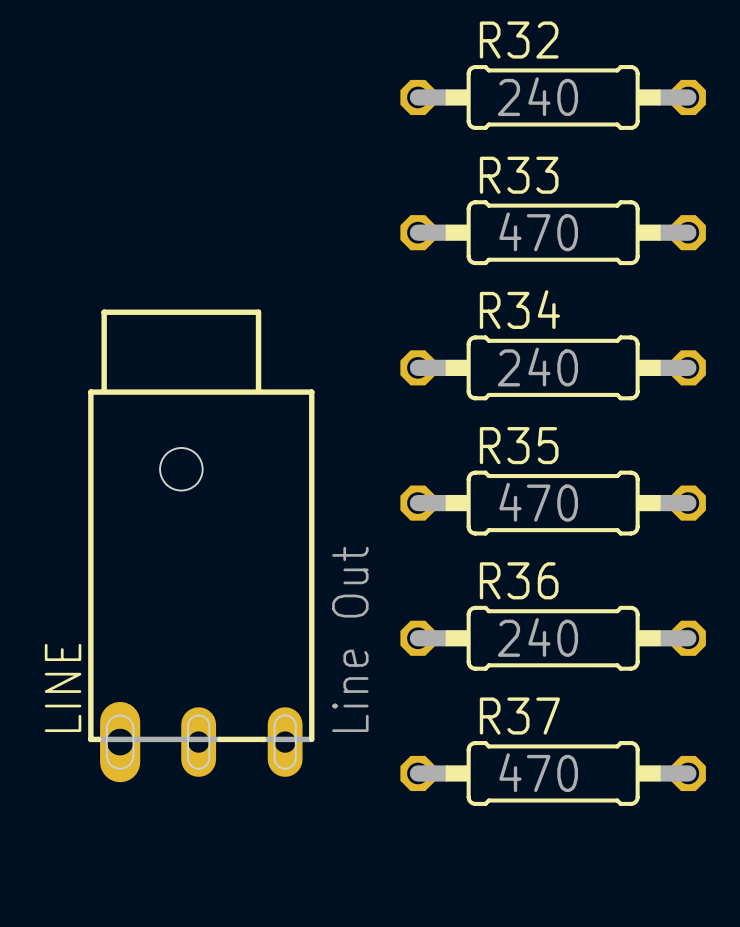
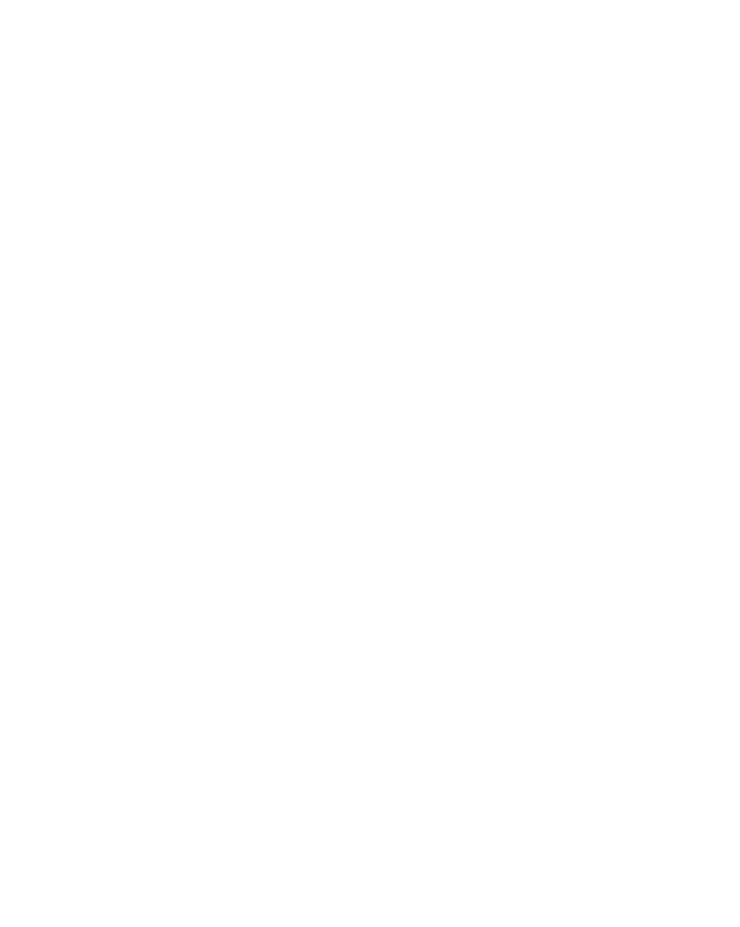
R32: 240 (553, 97) -> none
R33: 470 (553, 232) -> none
R34: 240 (553, 367) -> none
R35: 470 (553, 503) -> none
LINE: Line Out (201, 545) -> none
R36: 240 (553, 638) -> none
R37: 470 (553, 773) -> none

